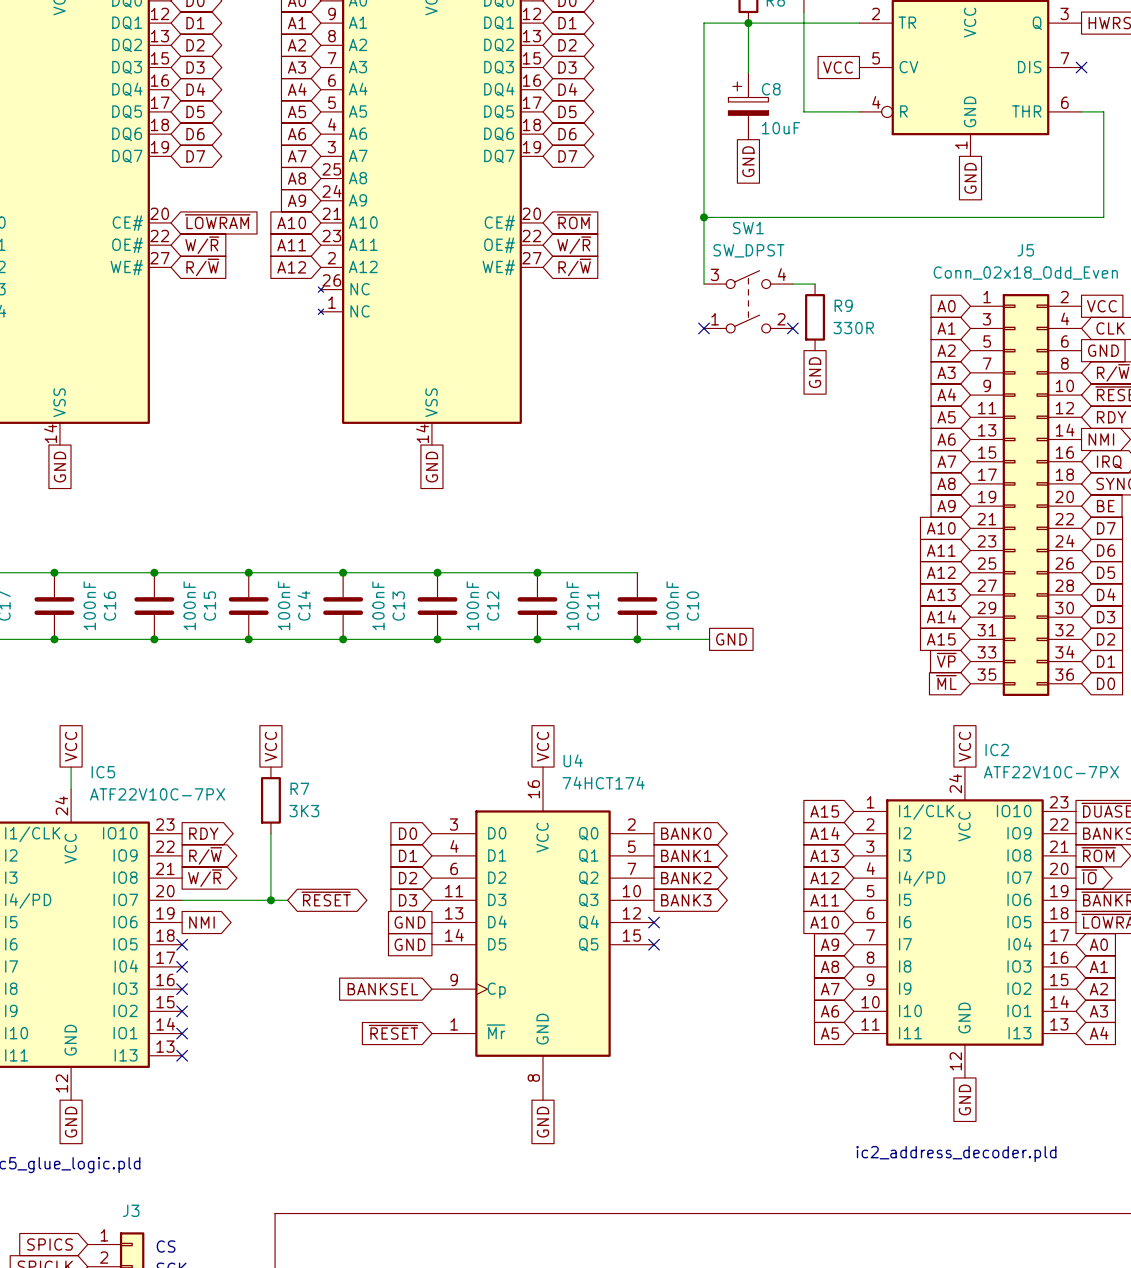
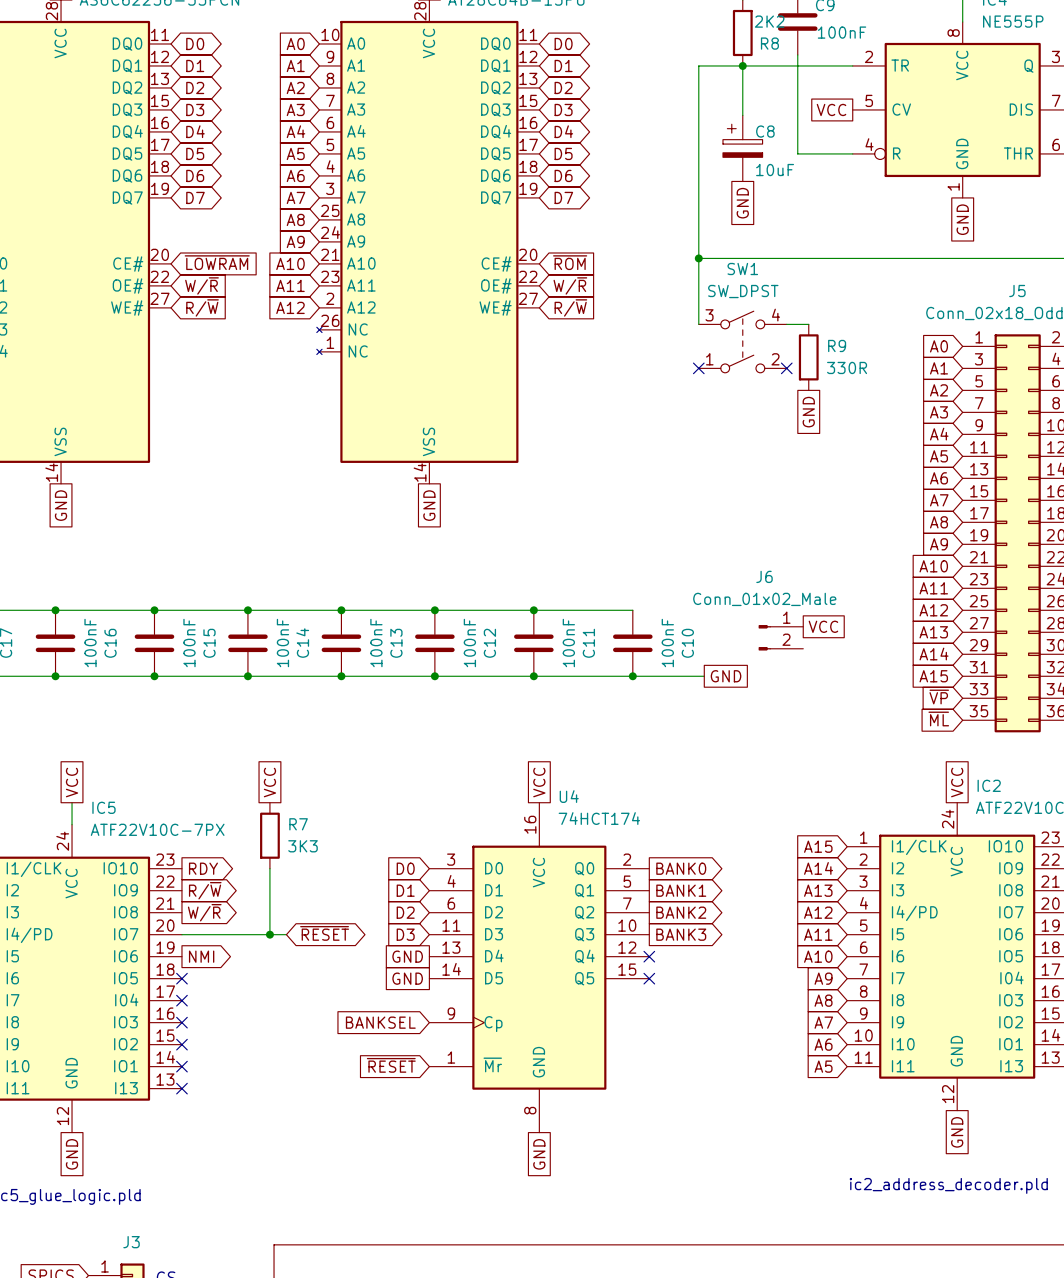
global label: none -> VCC (823, 626)
J6: none -> Conn_01x02_Male (780, 637)

